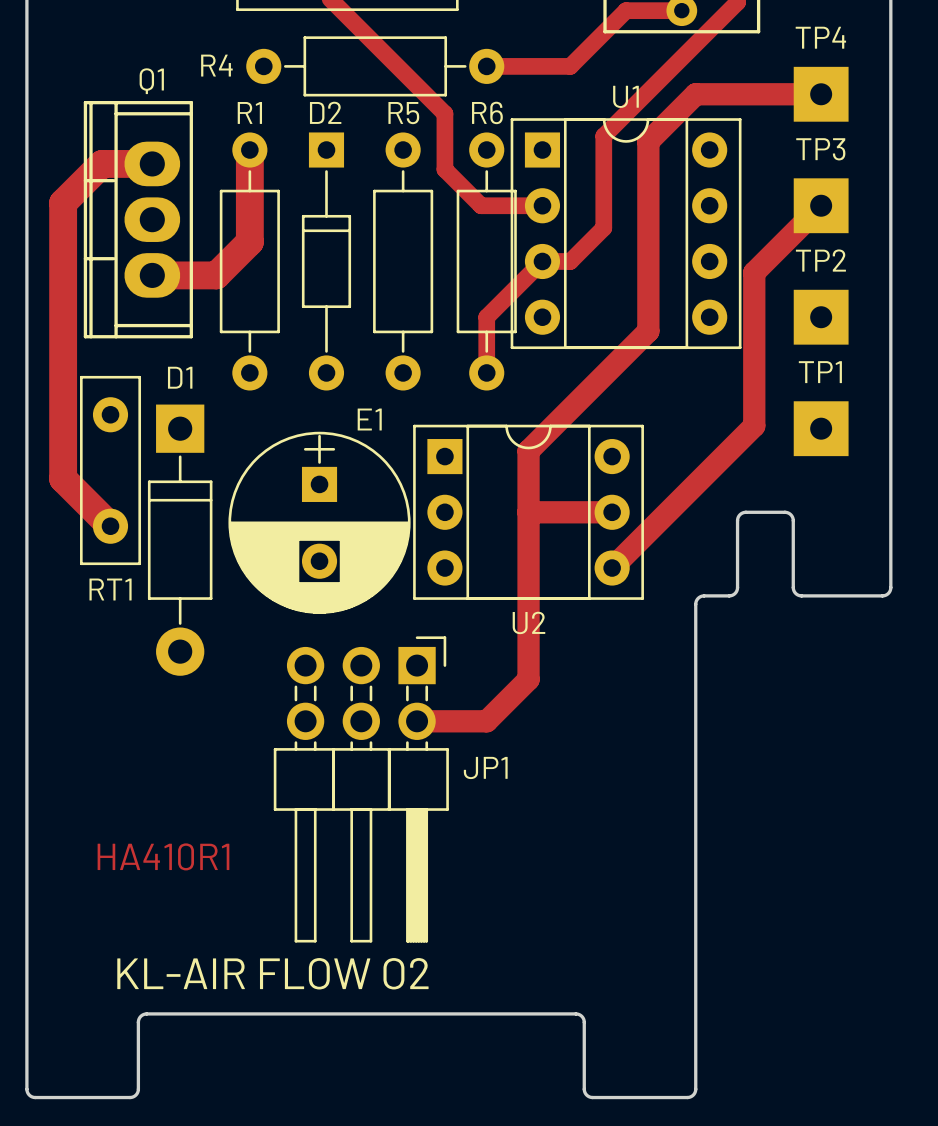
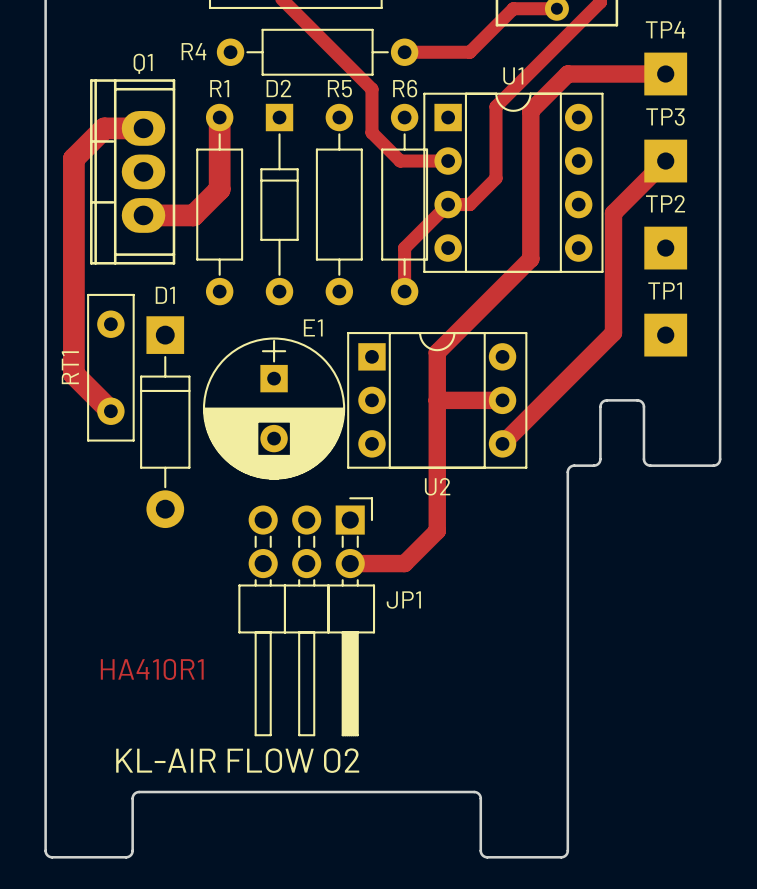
RT1 name rotation: 0° (110, 589) -> 90° counterclockwise (70, 367)
RT1 name position: RT1 (110, 589) -> RT1 (70, 367)

